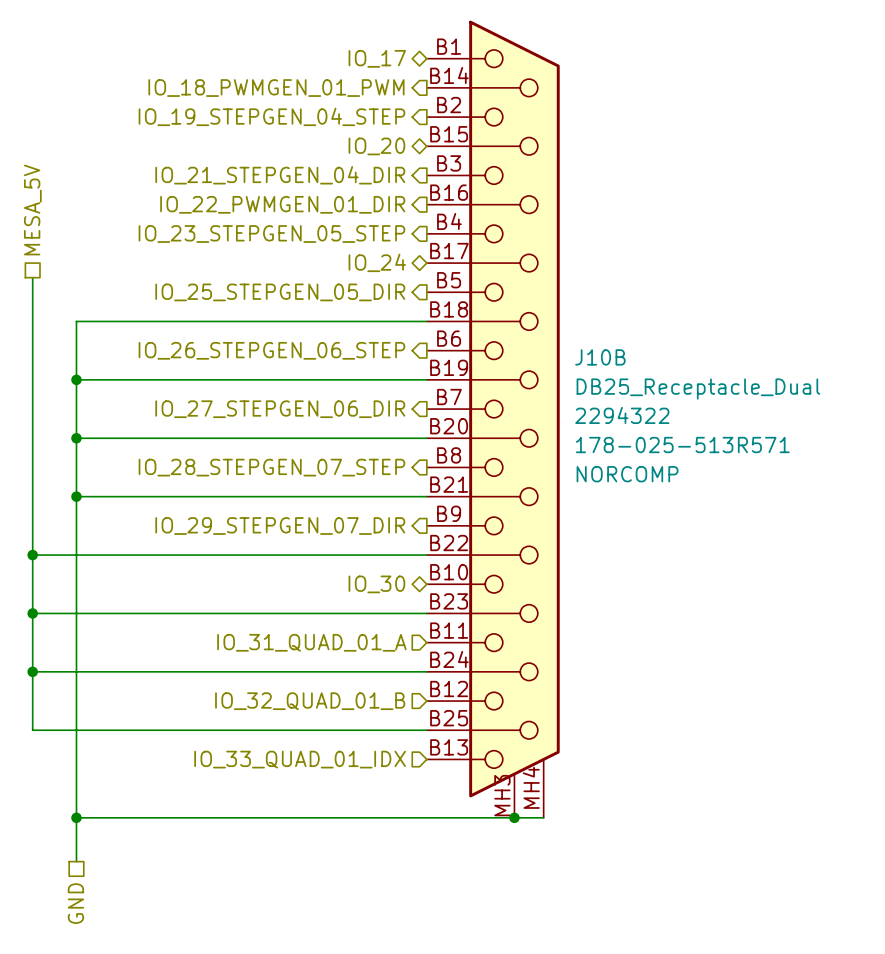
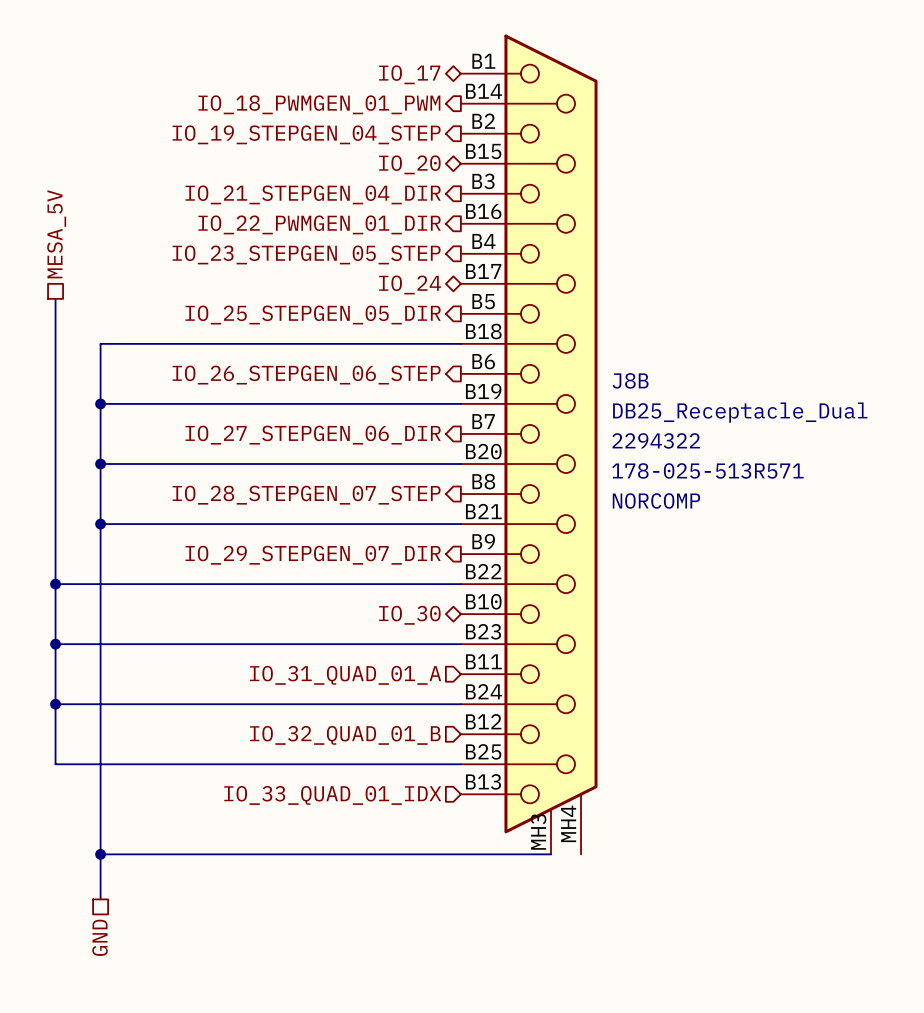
J10B name: J10B (600, 357) -> J8B (630, 380)
wire: (514, 817) (543, 817) -> none
junction: (514, 817) -> none

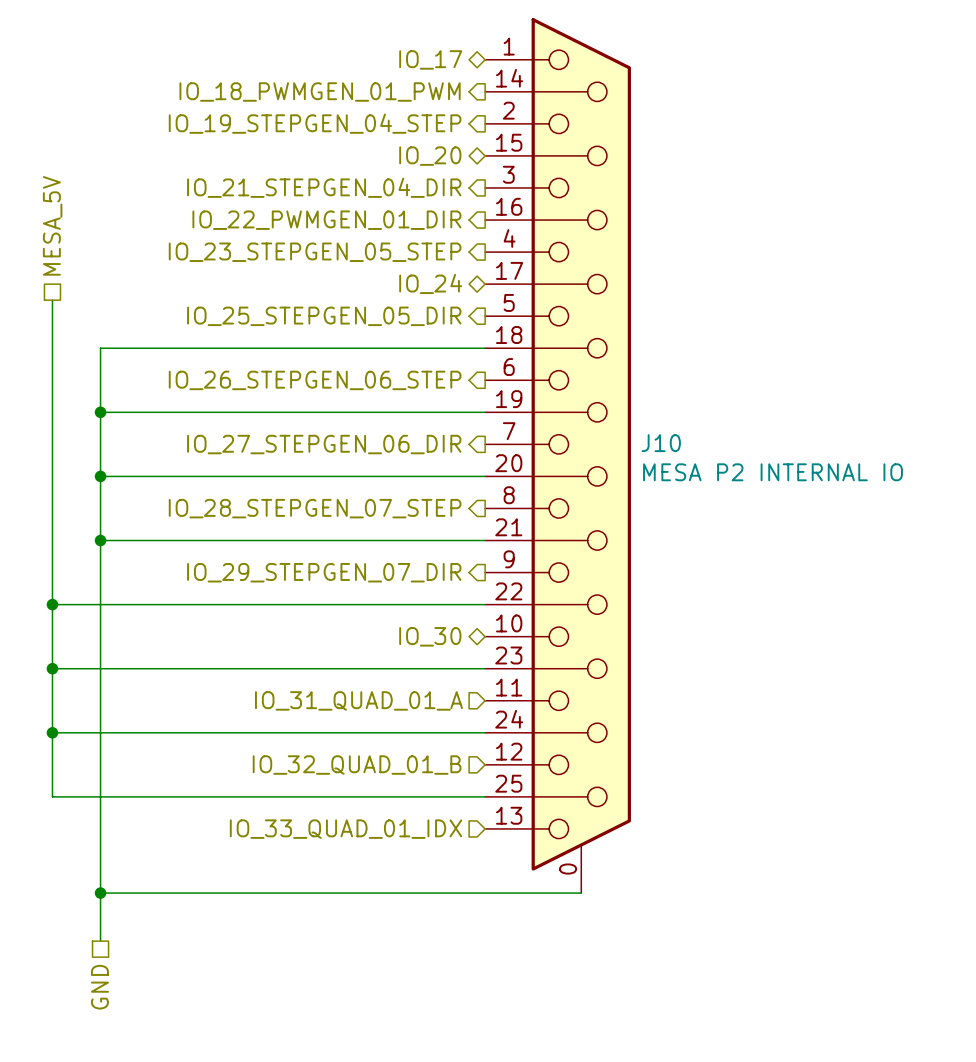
J8B: DB25_Receptacle_Dual (529, 444) -> none
J10: none -> MESA P2 INTERNAL IO (558, 455)

